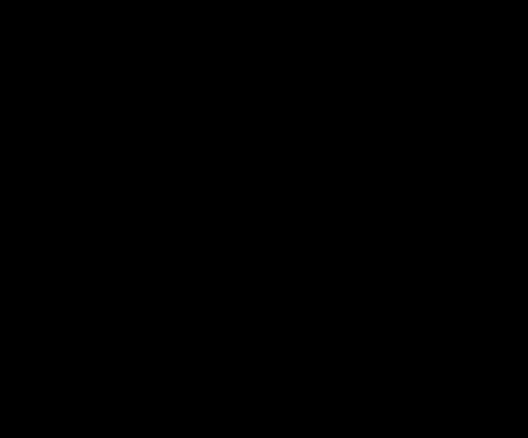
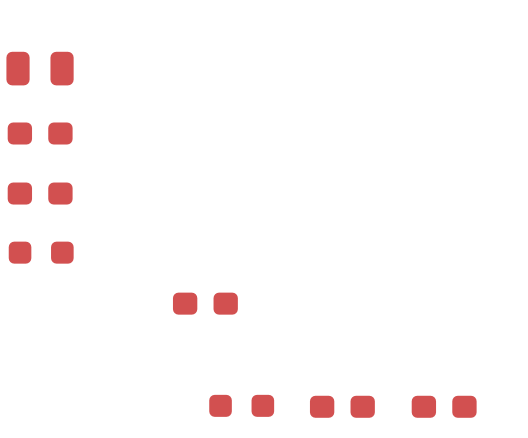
part: none -> (40, 68)
part: none -> (40, 133)
part: none -> (40, 193)
part: none -> (41, 252)
part: none -> (205, 303)
part: none -> (241, 405)
part: none -> (342, 406)
part: none -> (444, 406)

